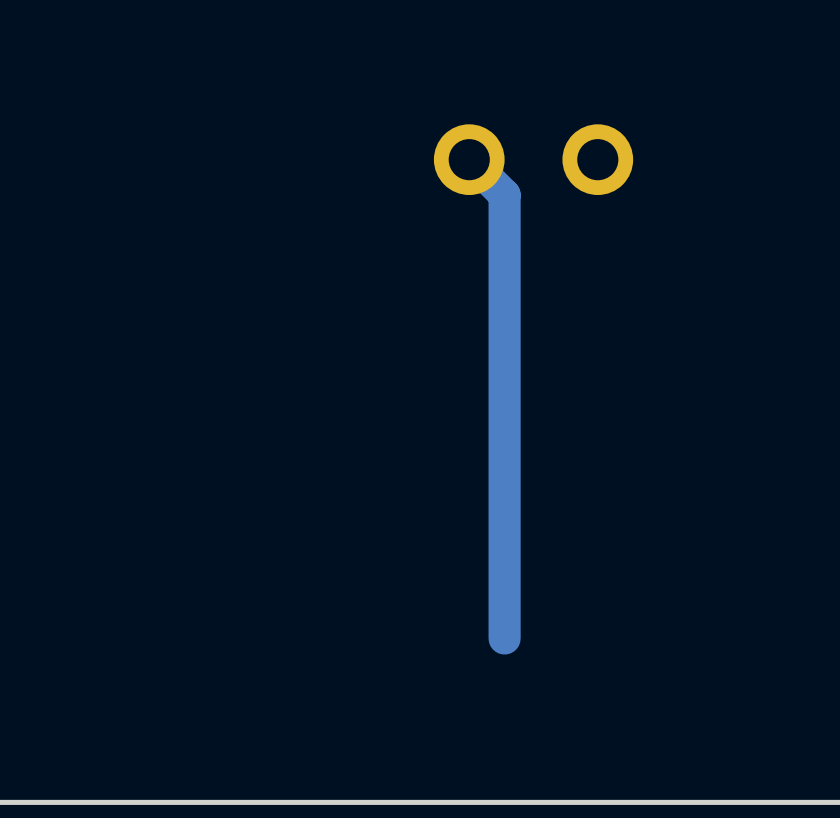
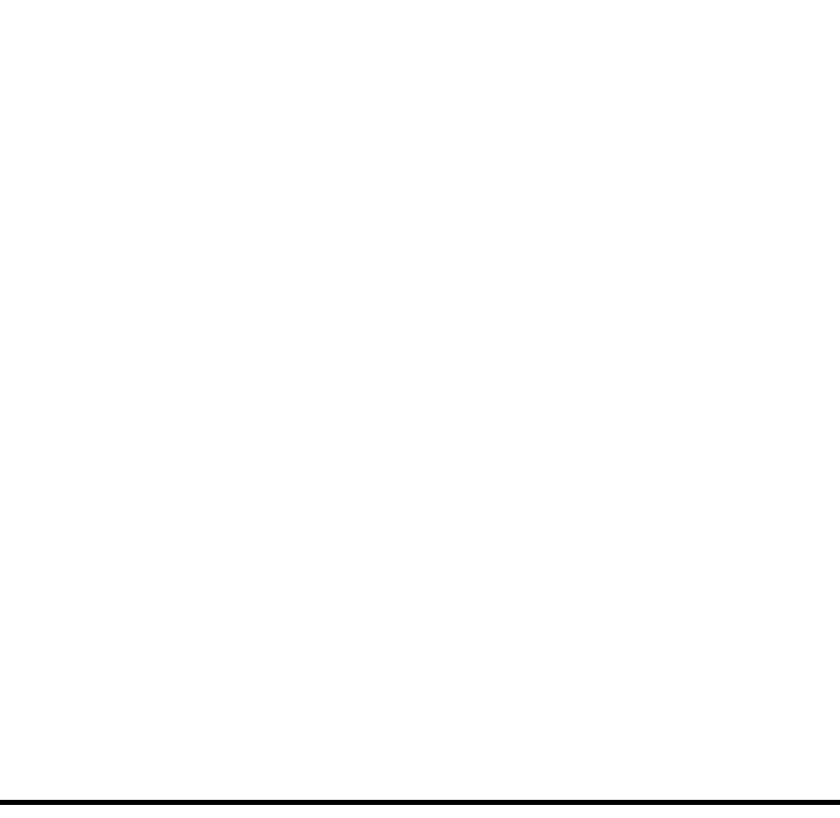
track: (469, 159) (504, 195) (504, 638) -> none
part: (533, 159) -> none

